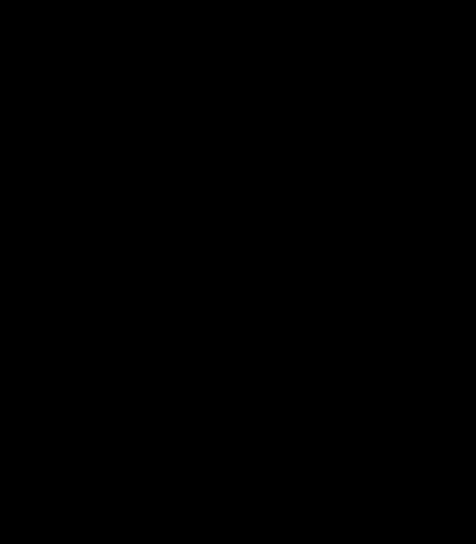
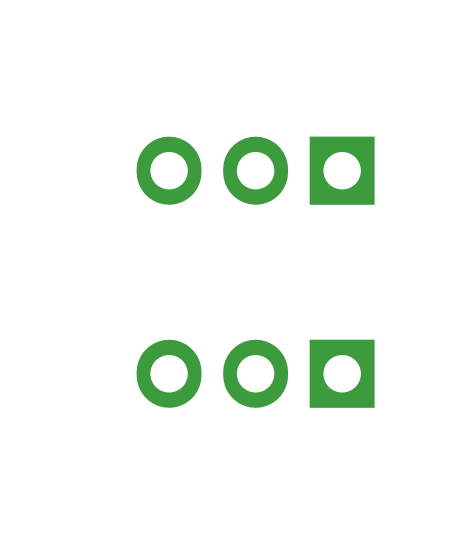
part: none -> (255, 170)
part: none -> (255, 373)

